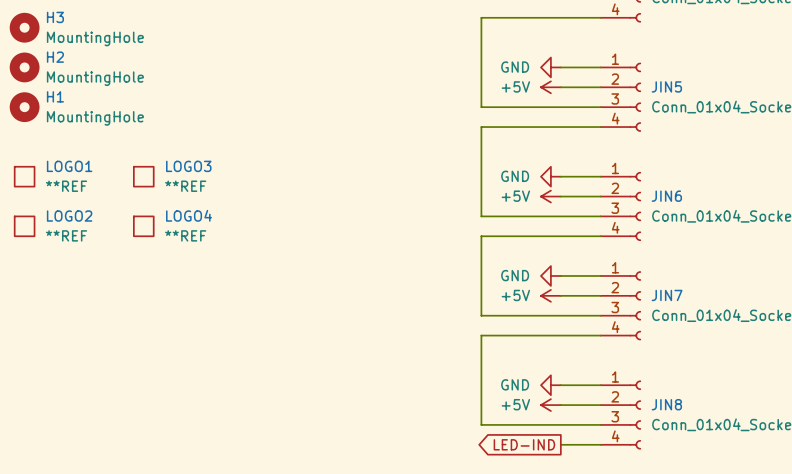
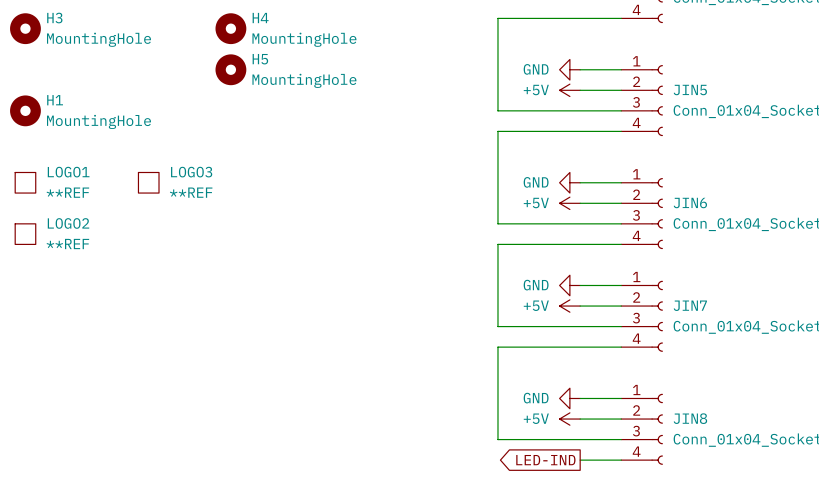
H4: none -> MountingHole (230, 28)
H2: MountingHole (24, 67) -> none
H5: none -> MountingHole (230, 69)
LOGO4: **REF (143, 226) -> none

